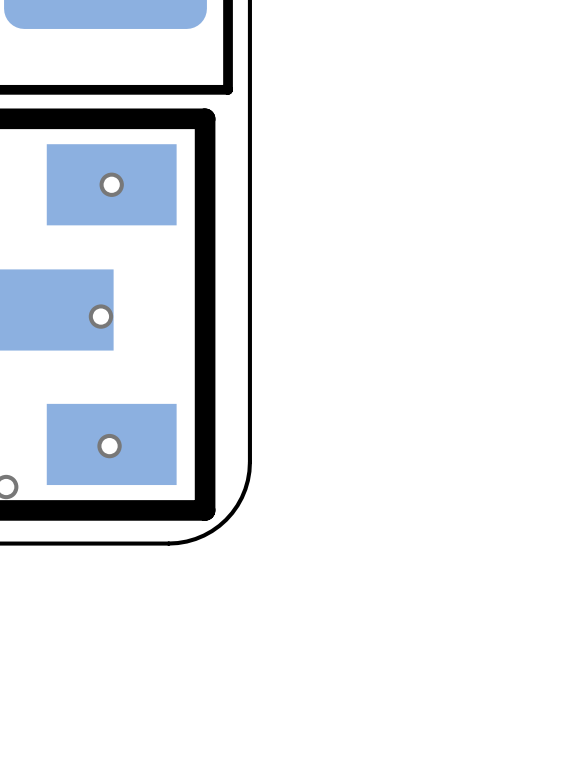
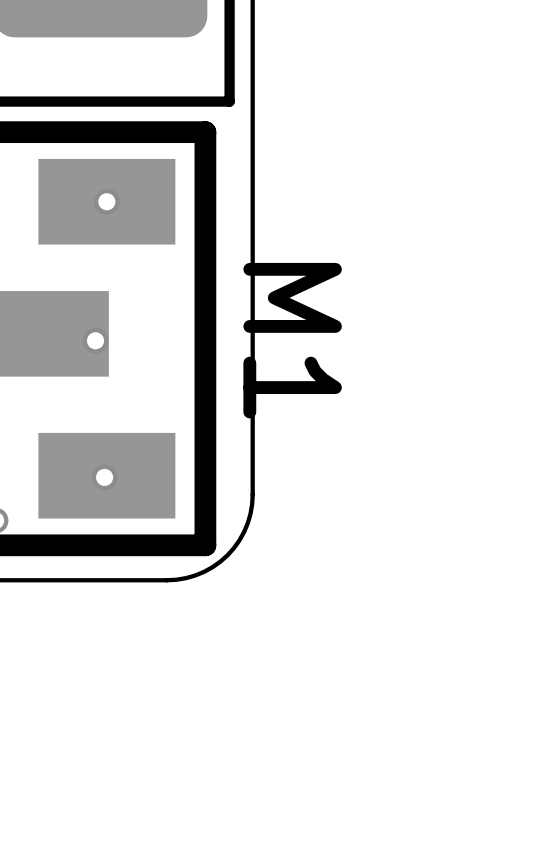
M1 name: none -> M1 (292, 340)

